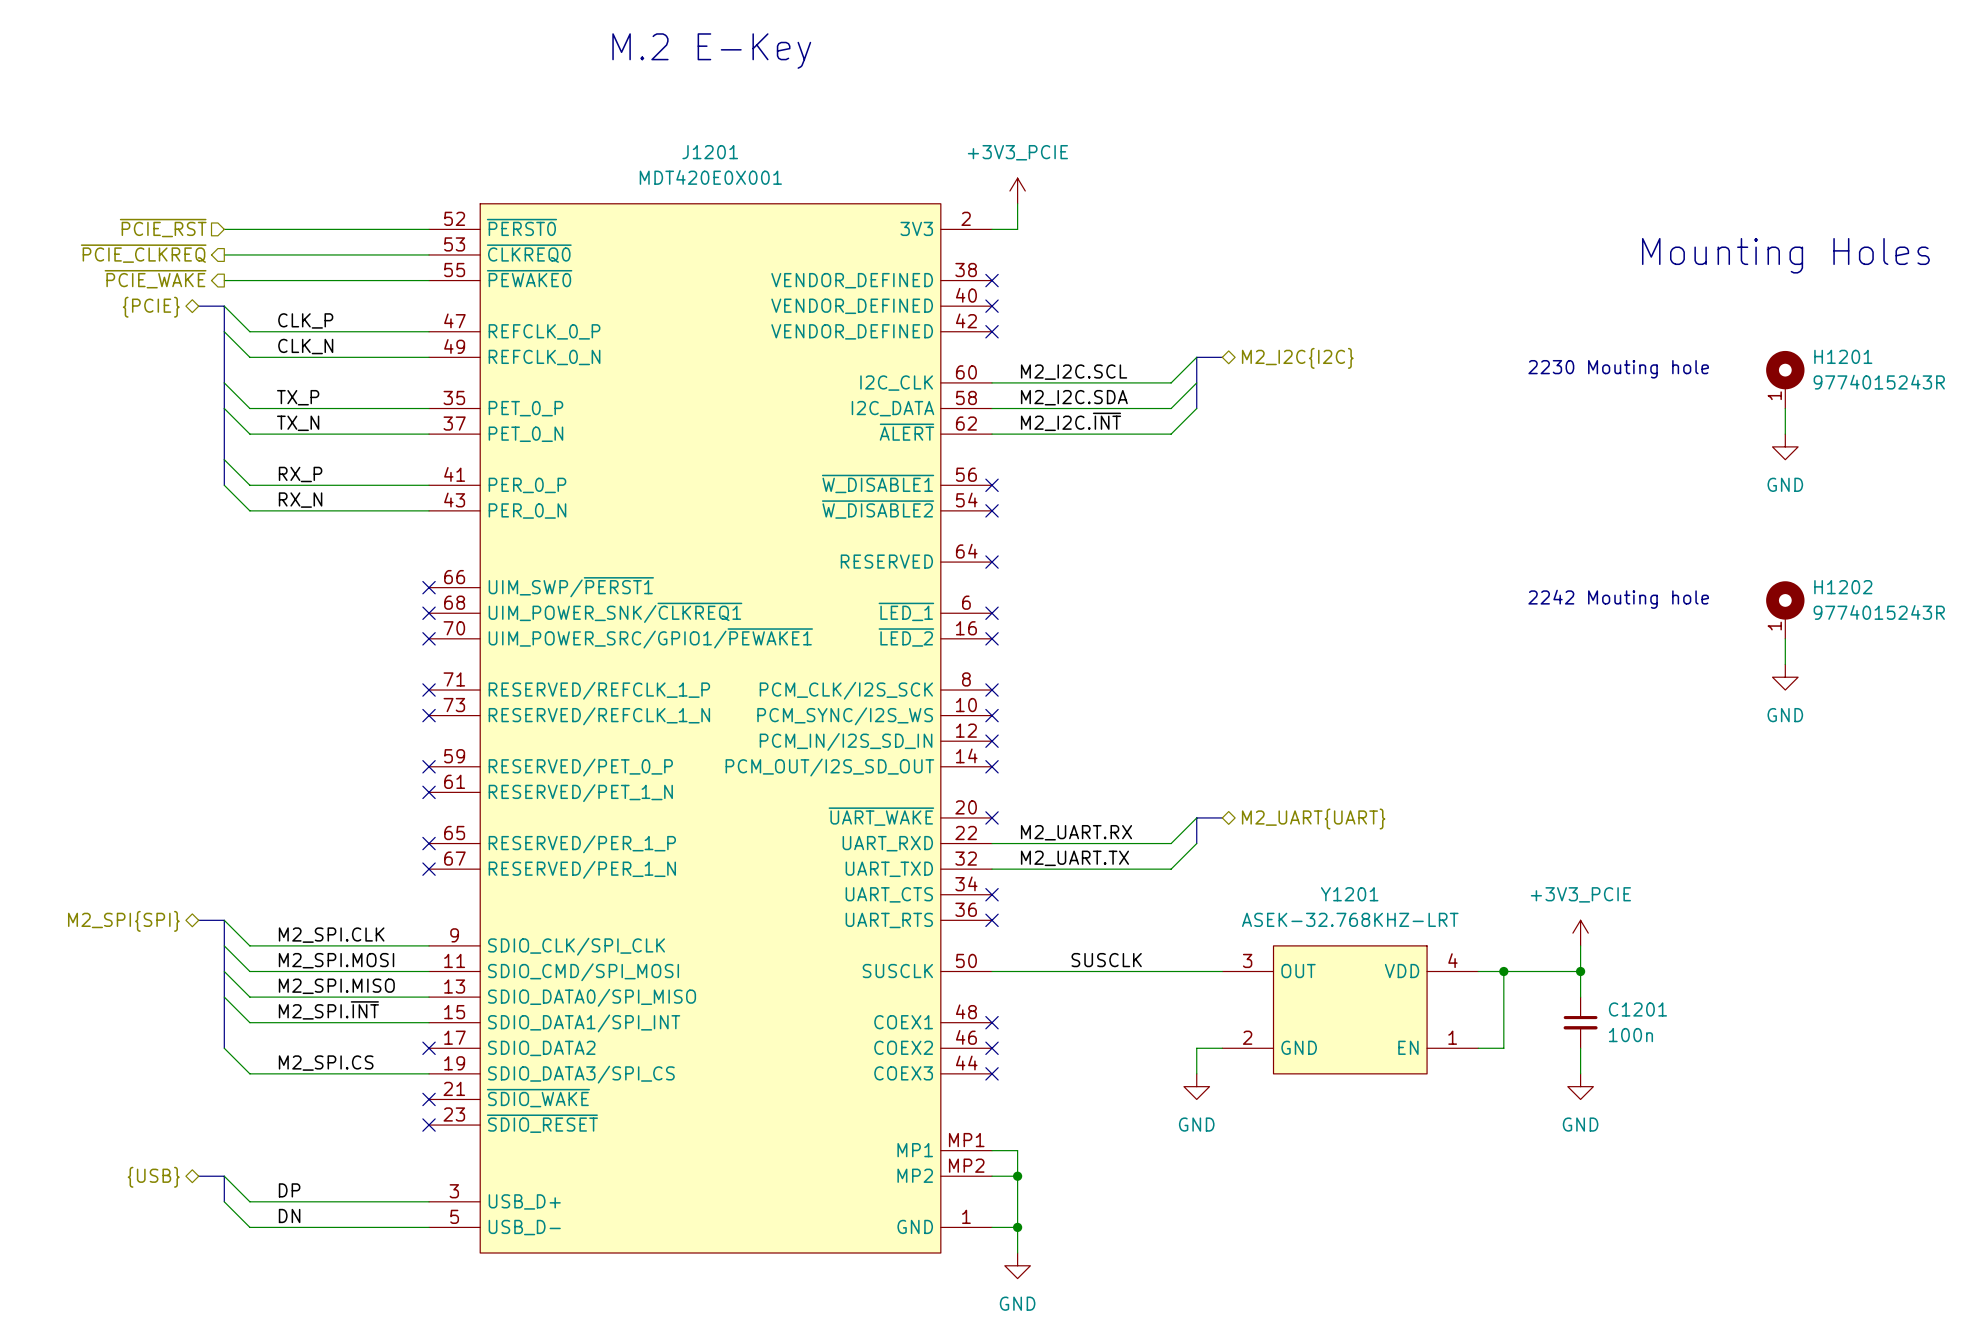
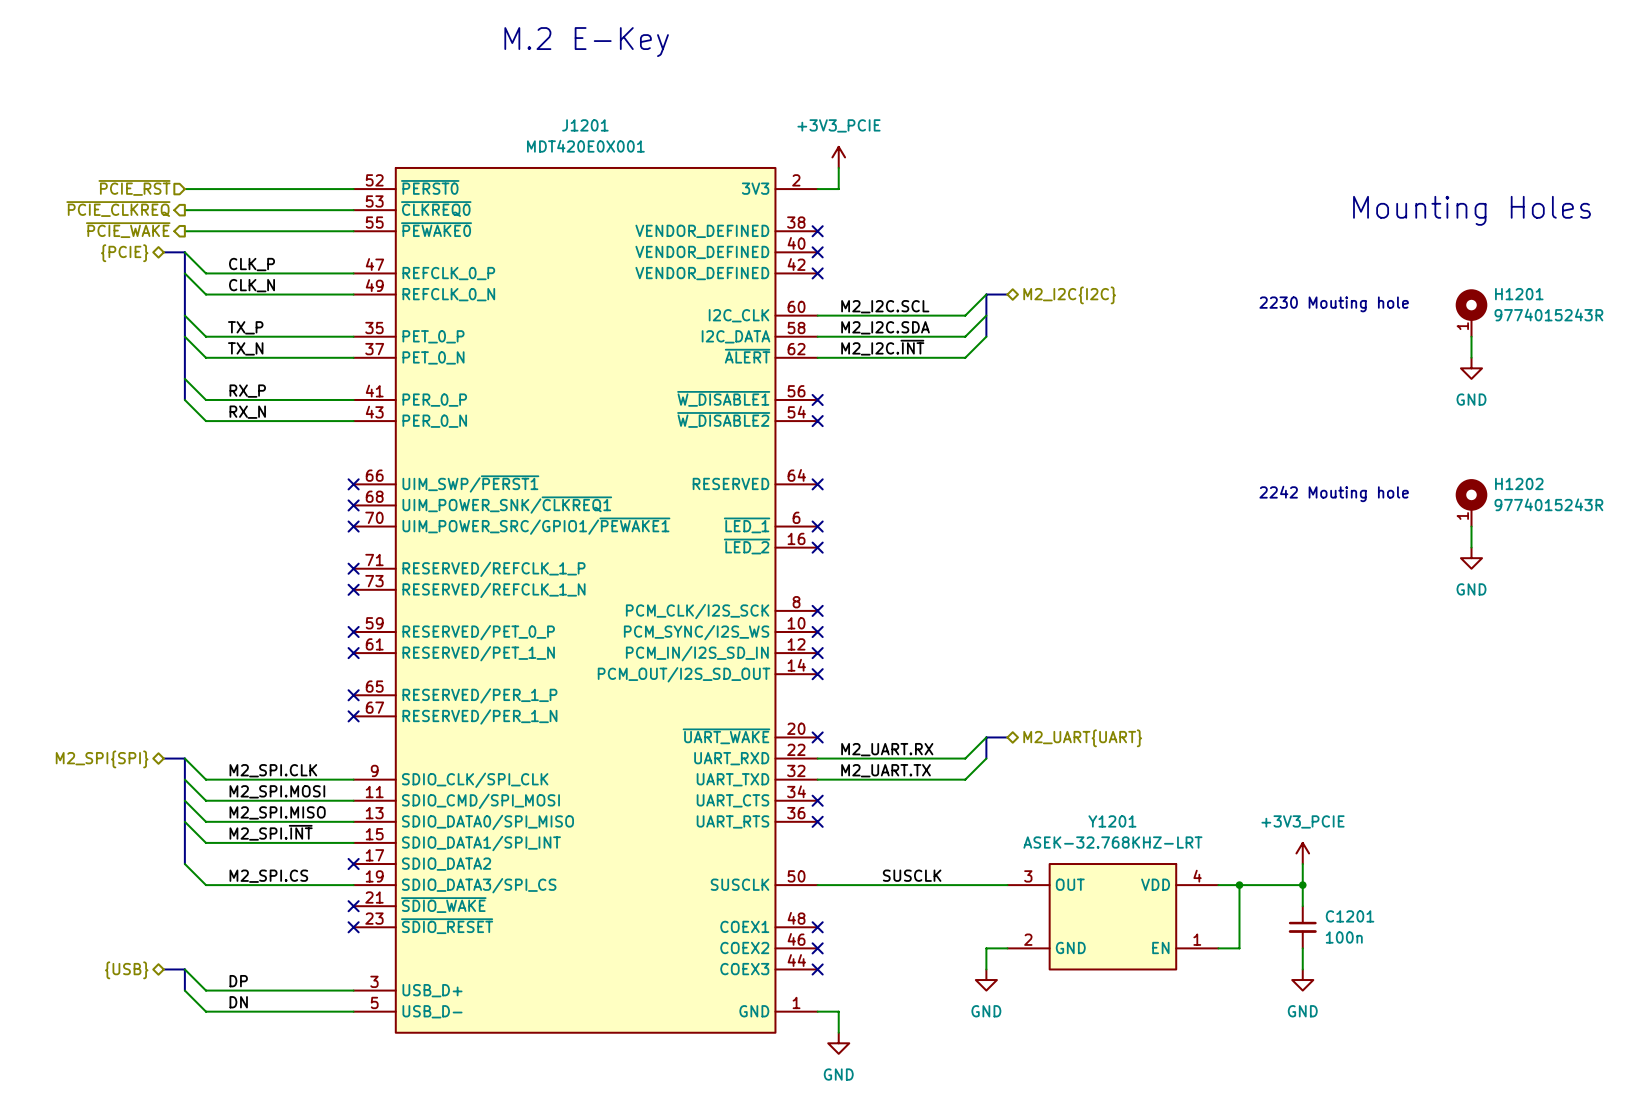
J1201 symbol: [429, 203, 993, 1253] -> [353, 167, 818, 1033]
no-connect mark: (992, 562) -> none
no-connect mark: none -> (817, 484)
no-connect mark: (992, 613) -> none
no-connect mark: none -> (817, 547)
no-connect mark: (992, 690) -> none
no-connect mark: (992, 715) -> none
no-connect mark: none -> (817, 653)
wire: (1196, 817) (1171, 843) (992, 843) -> (986, 758) (965, 779) (817, 779)
bus: (1222, 817) (1196, 817) (1196, 843) -> (1007, 737) (986, 737) (986, 758)
hierarchical label position: M2_UART{UART} (1313, 819) -> M2_UART{UART} (1082, 738)
label position: M2_UART.RX (1076, 832) -> M2_UART.RX (887, 749)
wire: (1196, 843) (1171, 869) (992, 869) -> (986, 737) (965, 758) (817, 758)
label position: M2_UART.TX (1074, 858) -> M2_UART.TX (886, 770)
no-connect mark: (992, 920) -> none
power symbol position: +3V3_PCIE (1580, 933) -> +3V3_PCIE (1302, 853)
wire: (1580, 945) (1580, 997) -> none
label position: SUSCLK (1106, 960) -> SUSCLK (912, 875)
wire: (992, 971) (1222, 971) -> (817, 885) (1007, 885)
no-connect mark: none -> (817, 800)
wire: (1478, 971) (1580, 971) -> none
wire: (1503, 971) (1503, 1048) (1478, 1048) -> (1239, 885) (1239, 948) (1218, 948)
junction: (1503, 971) -> none
junction: (1580, 971) -> none
no-connect mark: none -> (817, 821)
Y1201 position: (1350, 1009) -> (1112, 916)
no-connect mark: (992, 1022) -> none
C1201 position: (1580, 1022) -> (1302, 927)
no-connect mark: (992, 1048) -> none
wire: (1222, 1048) (1196, 1048) (1196, 1073) -> (1007, 948) (986, 948) (986, 969)
no-connect mark: (992, 1073) -> none
wire: none -> (1218, 885) (1302, 885) (1302, 906)
junction: none -> (1239, 885)
junction: none -> (1302, 885)
power symbol position: GND (1196, 1086) -> GND (986, 980)
power symbol position: GND (1580, 1086) -> GND (1302, 980)
no-connect mark: none -> (817, 927)
wire: (992, 1150) (1017, 1150) (1017, 1227) -> none
no-connect mark: none -> (817, 948)
wire: none -> (1302, 948) (1302, 969)
wire: (992, 1176) (1017, 1176) -> none
no-connect mark: none -> (817, 969)
junction: (1017, 1176) -> none
junction: (1017, 1227) -> none

